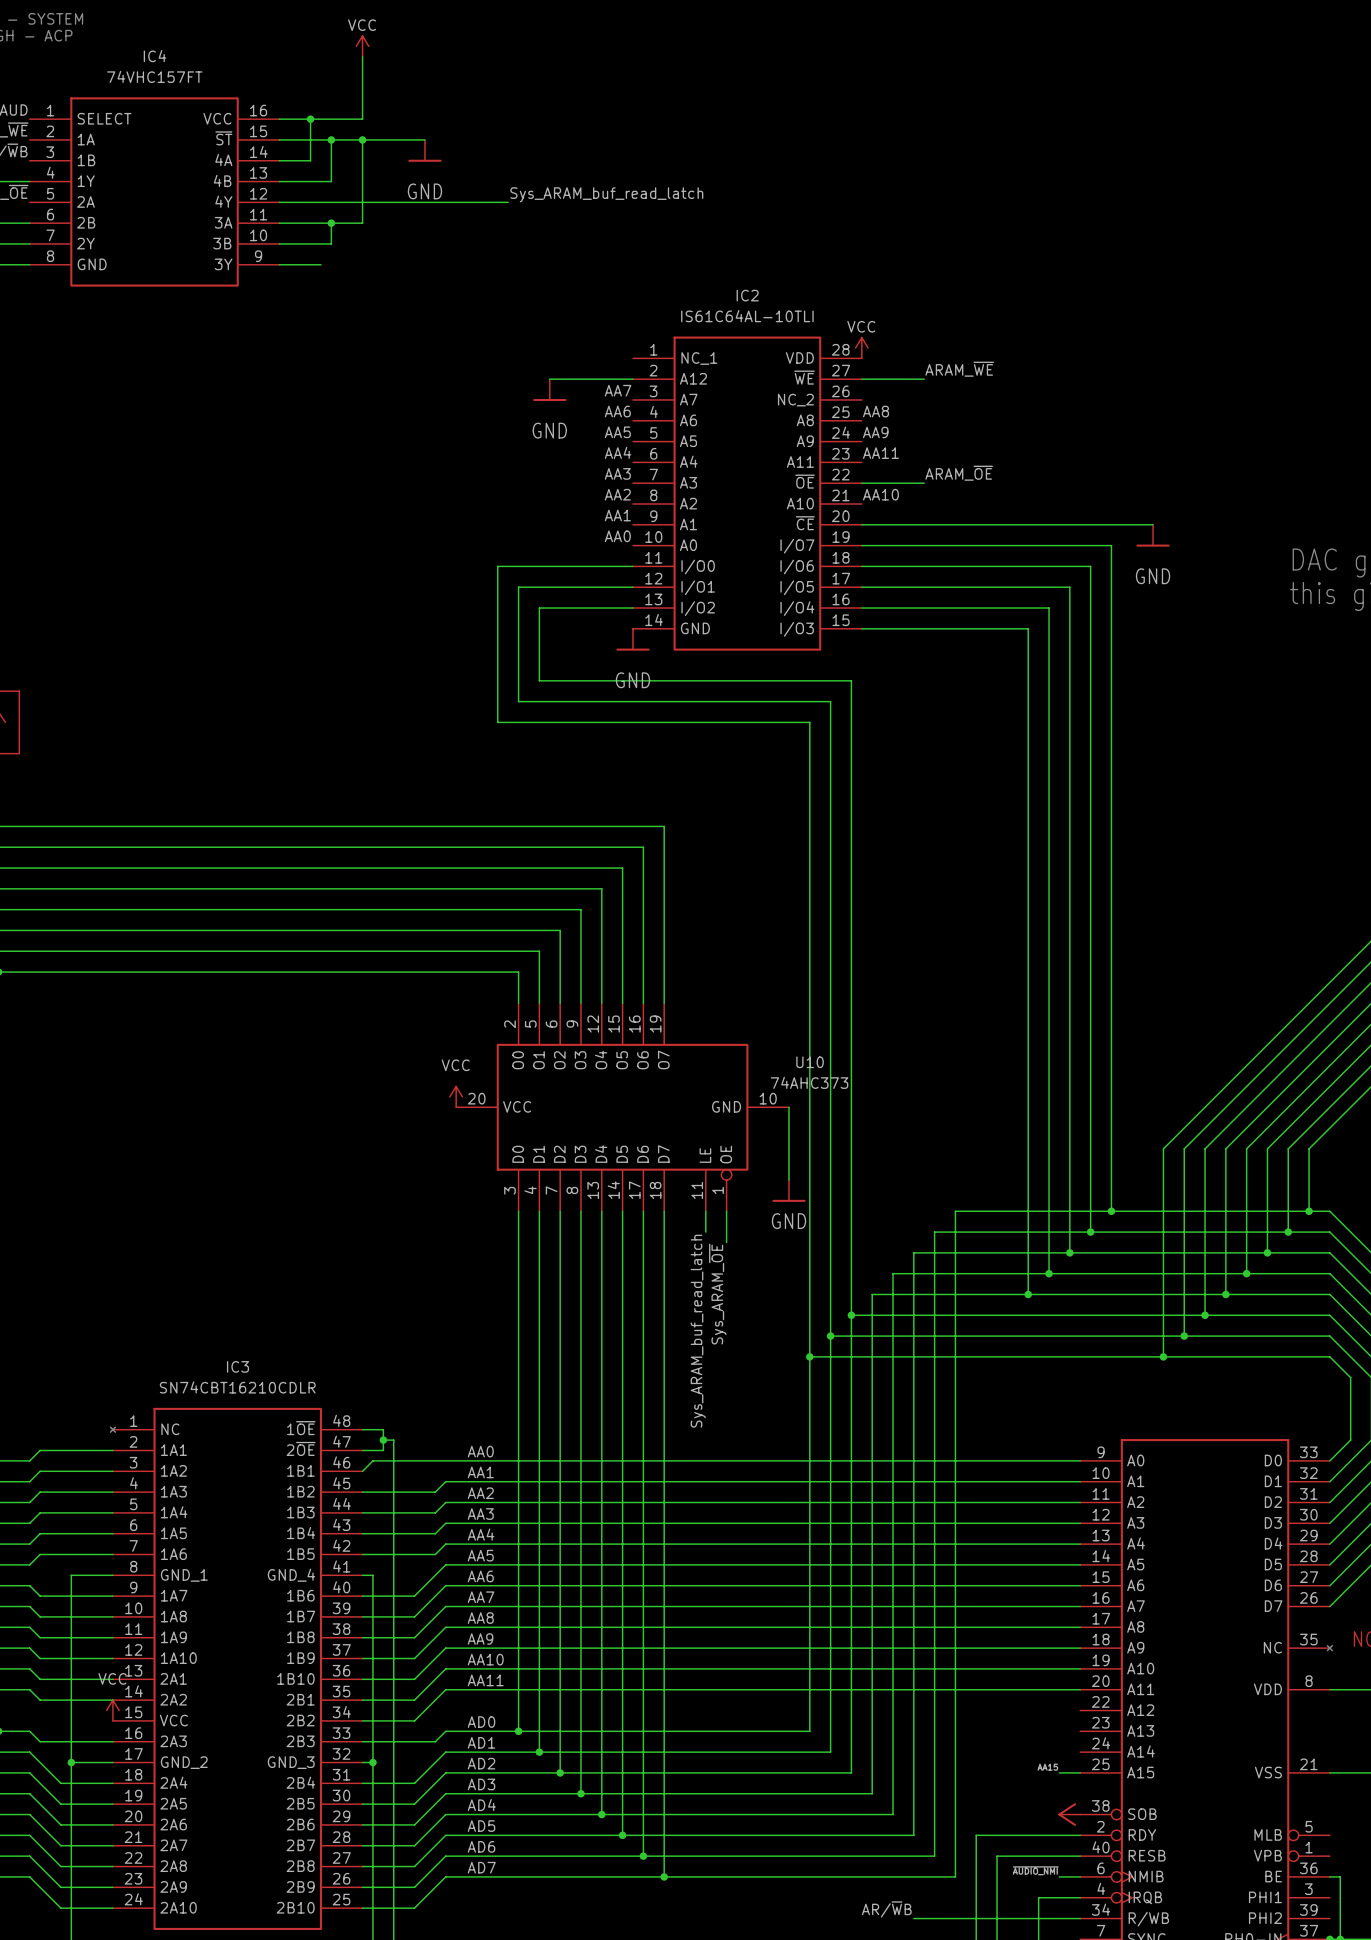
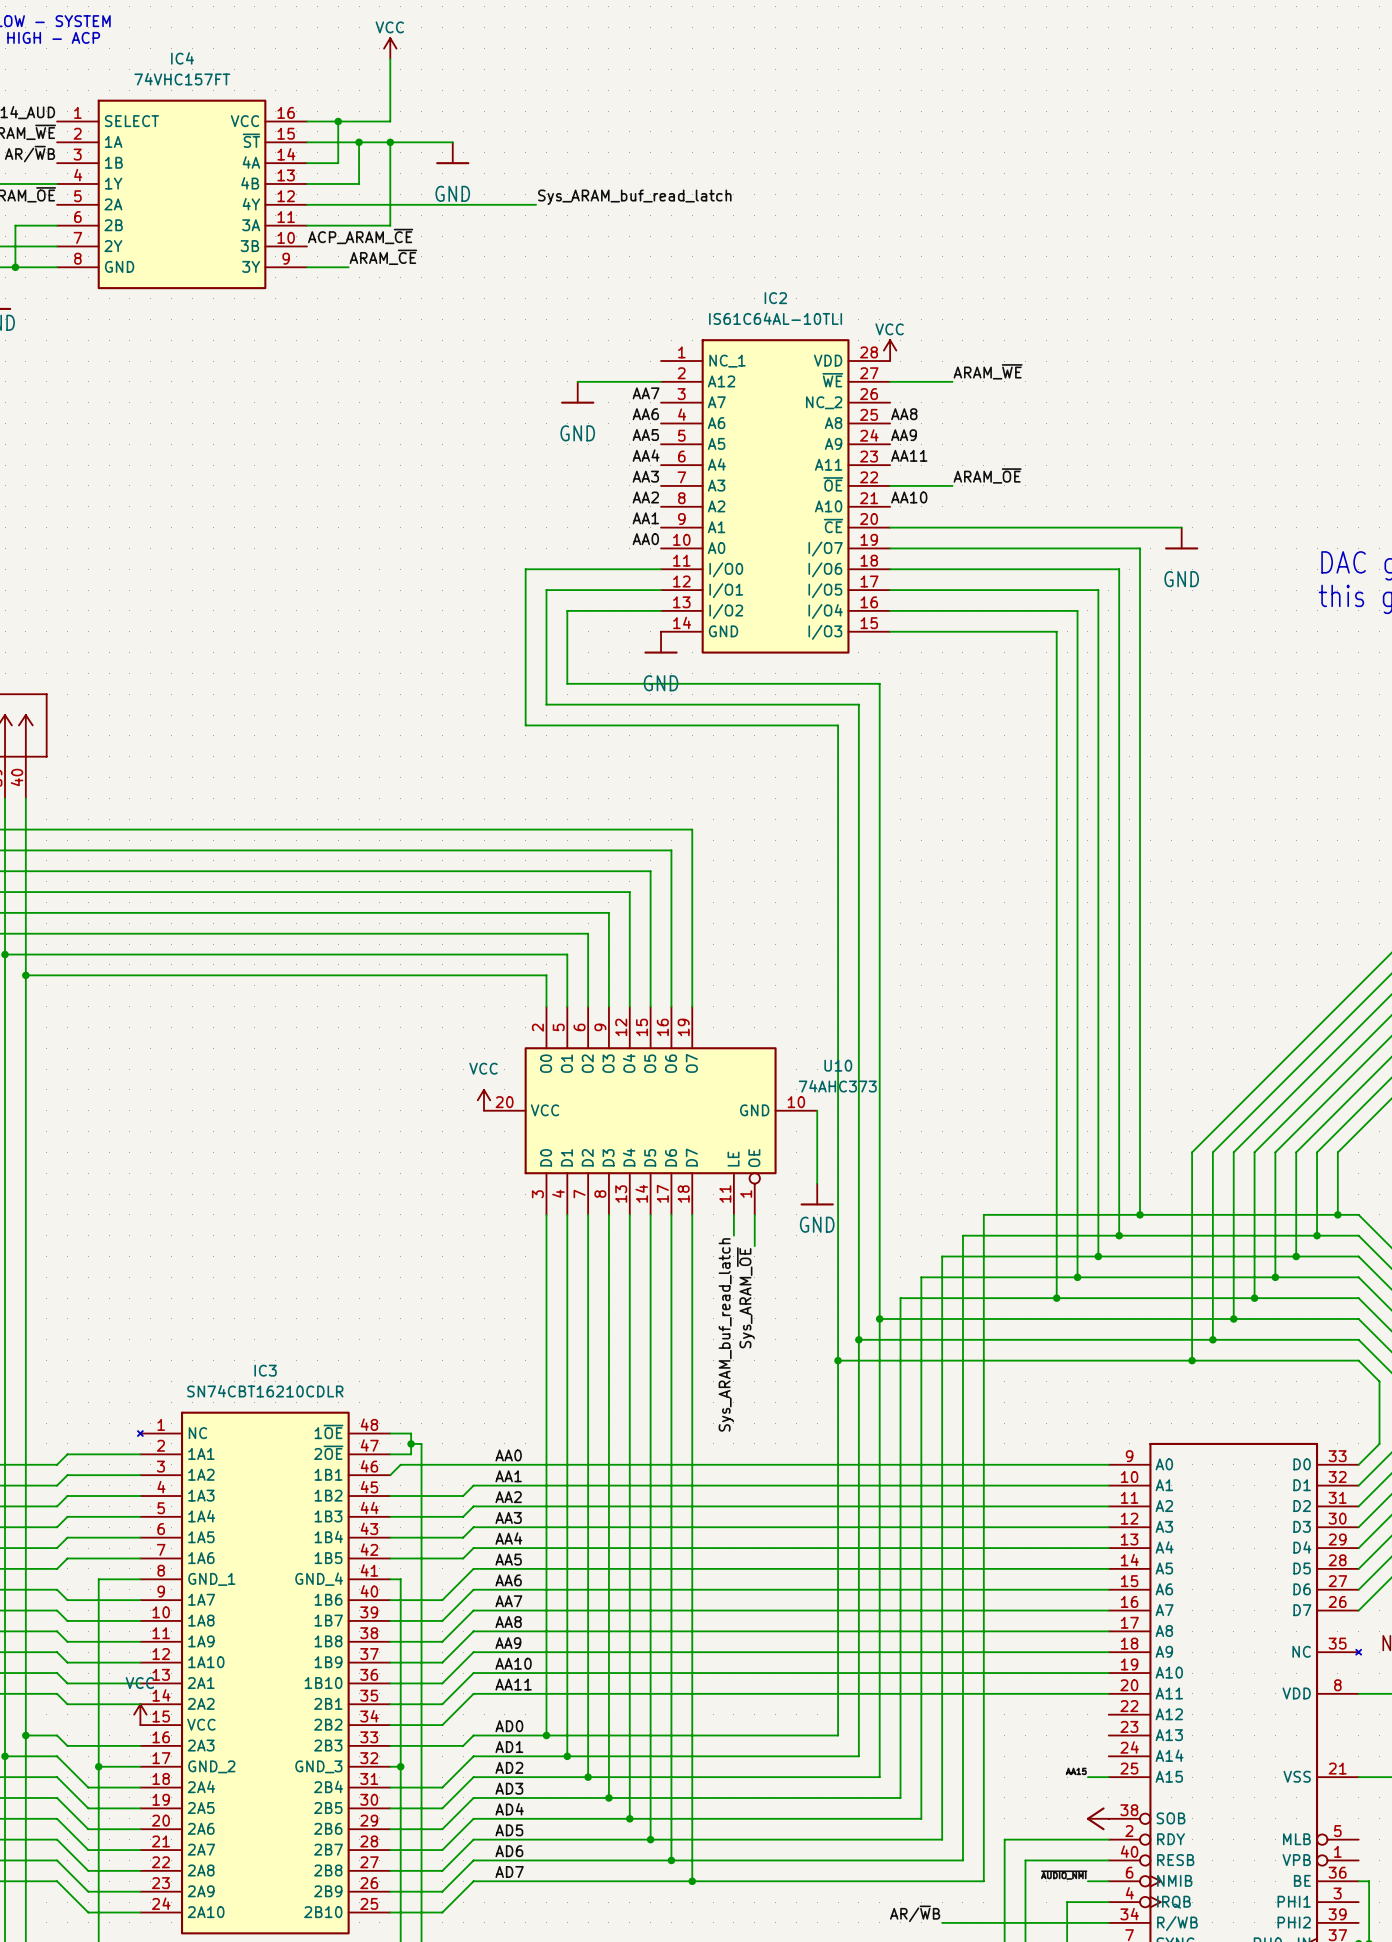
wire: (331, 223) (331, 243) (279, 243) -> none
junction: (331, 223) -> none
label: none -> ACP_ARAM_~{CE} (360, 236)
label: none -> ARAM_~{CE} (383, 257)

